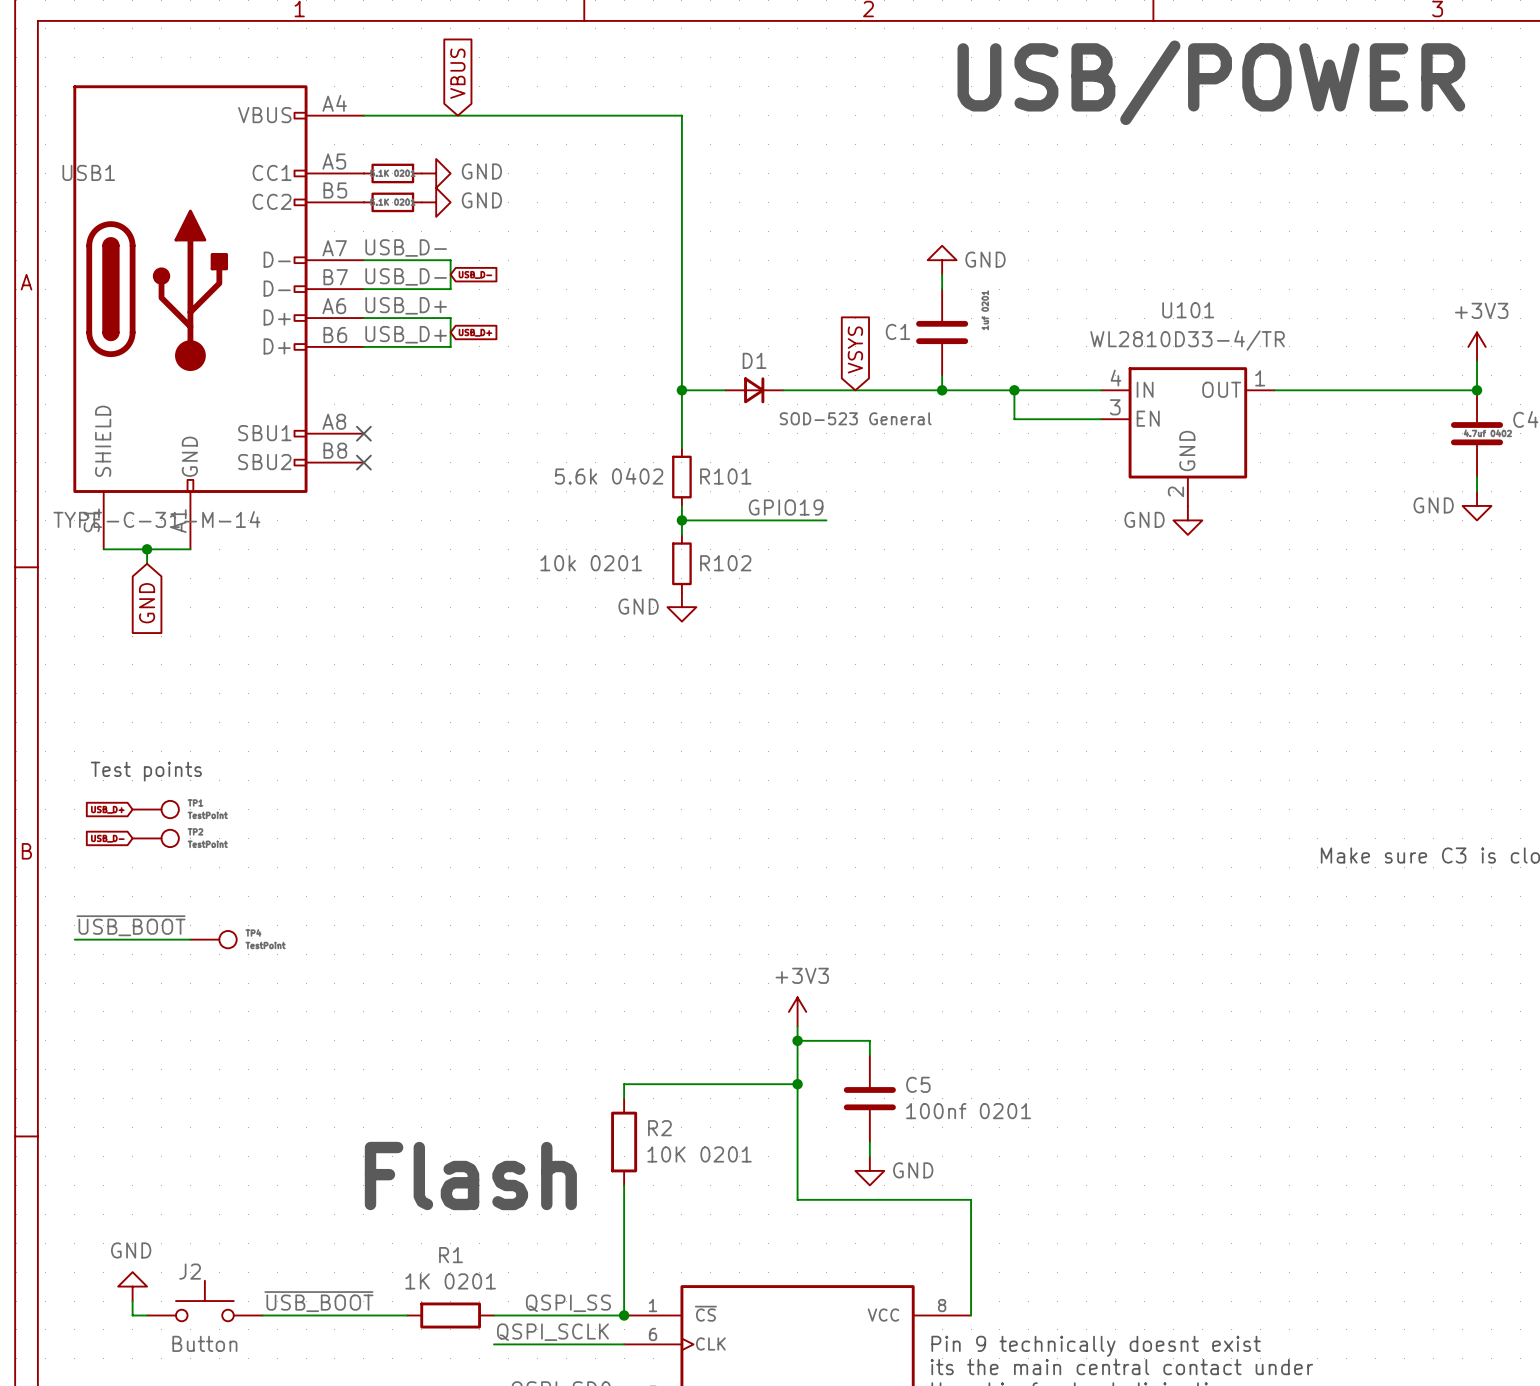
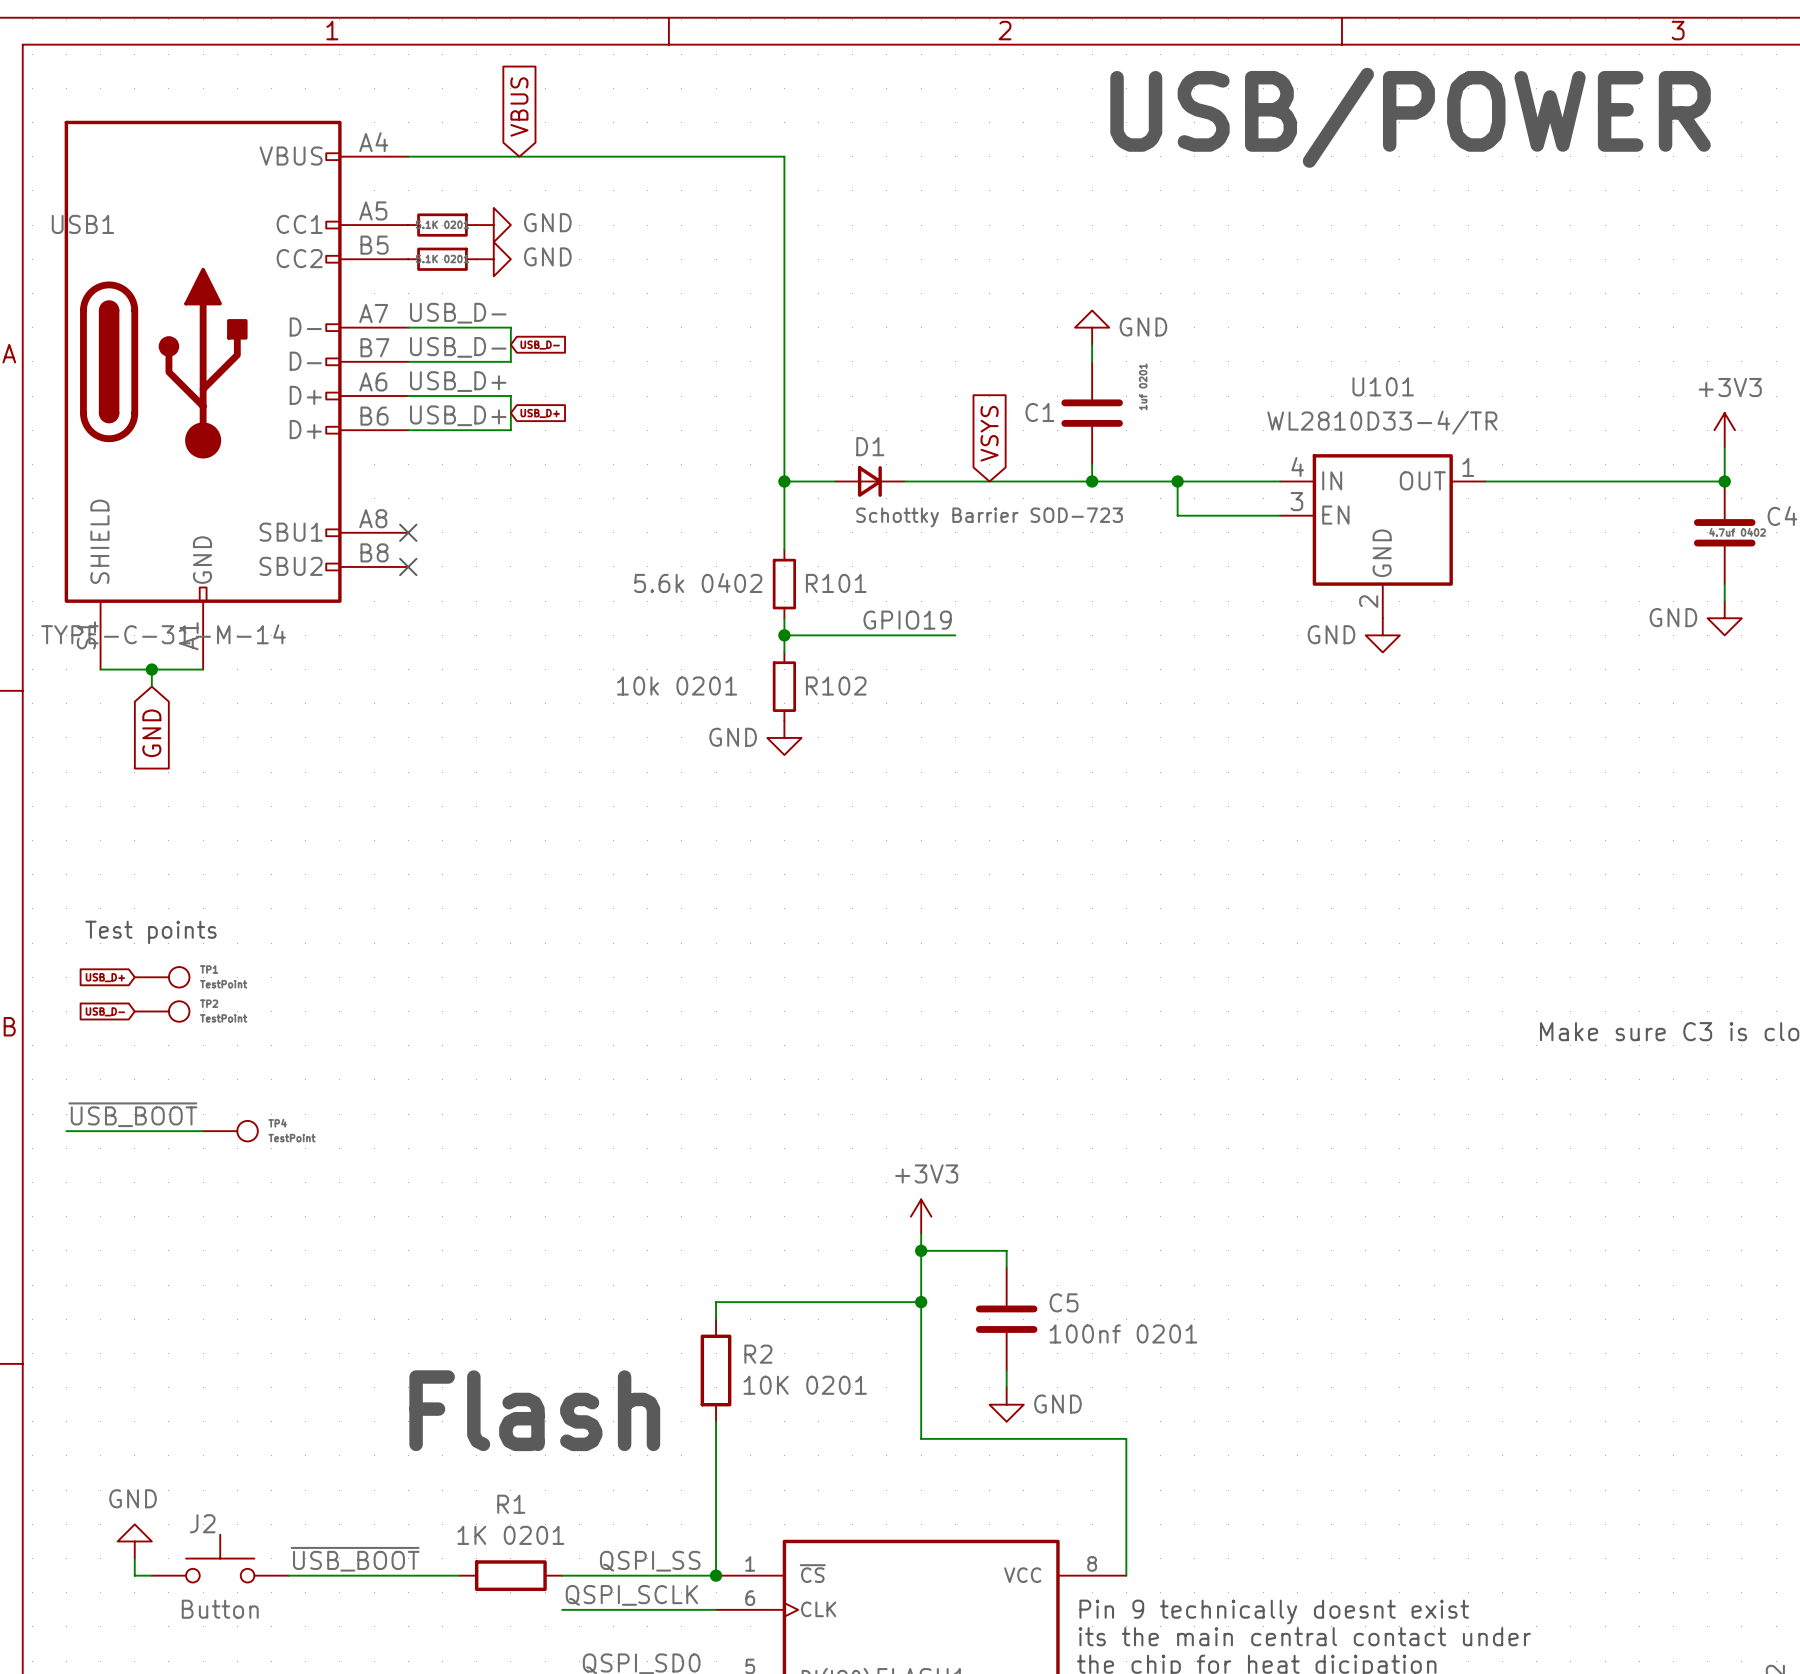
D1 value: SOD-523 General (855, 418) -> Schottky Barrier SOD-723 (989, 517)

